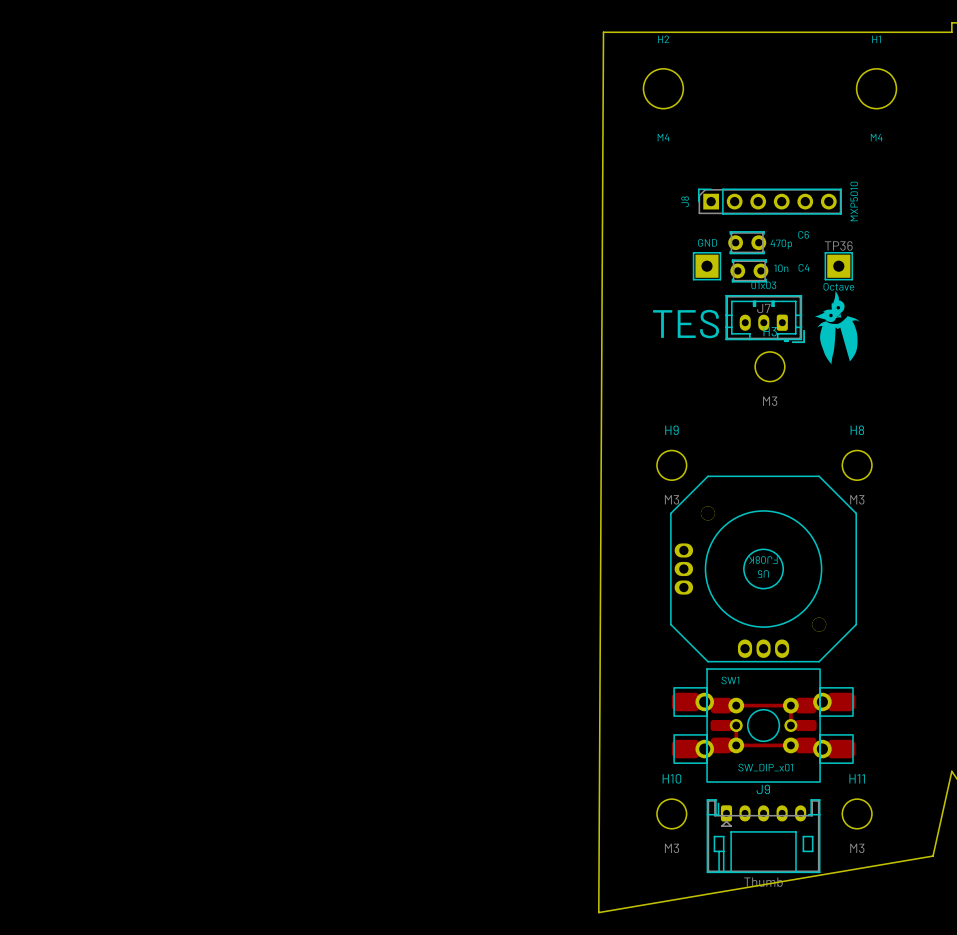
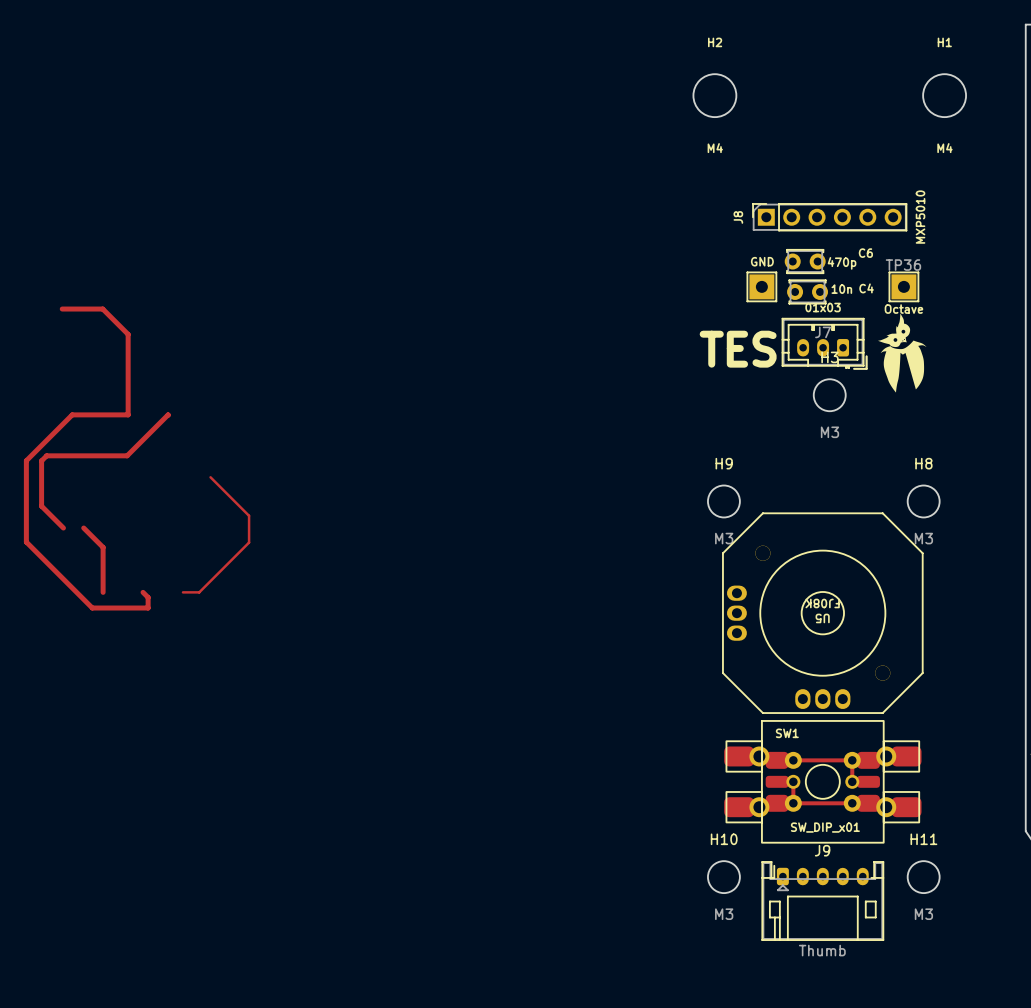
board edge: (951, 32) (603, 32) (598, 912) (933, 856) (951, 771) -> (1025, 34) (1025, 831)
track: none -> (62, 309) (102, 309) (128, 334) (128, 414) (72, 414) (26, 460) (26, 542) (92, 608) (148, 608) (148, 597) (143, 592)
track: none -> (168, 415) (127, 455) (46, 455) (41, 460) (41, 506) (63, 528)
track: none -> (210, 477) (249, 515) (249, 542) (199, 592) (183, 592)
track: none -> (83, 528) (103, 547) (103, 592)

